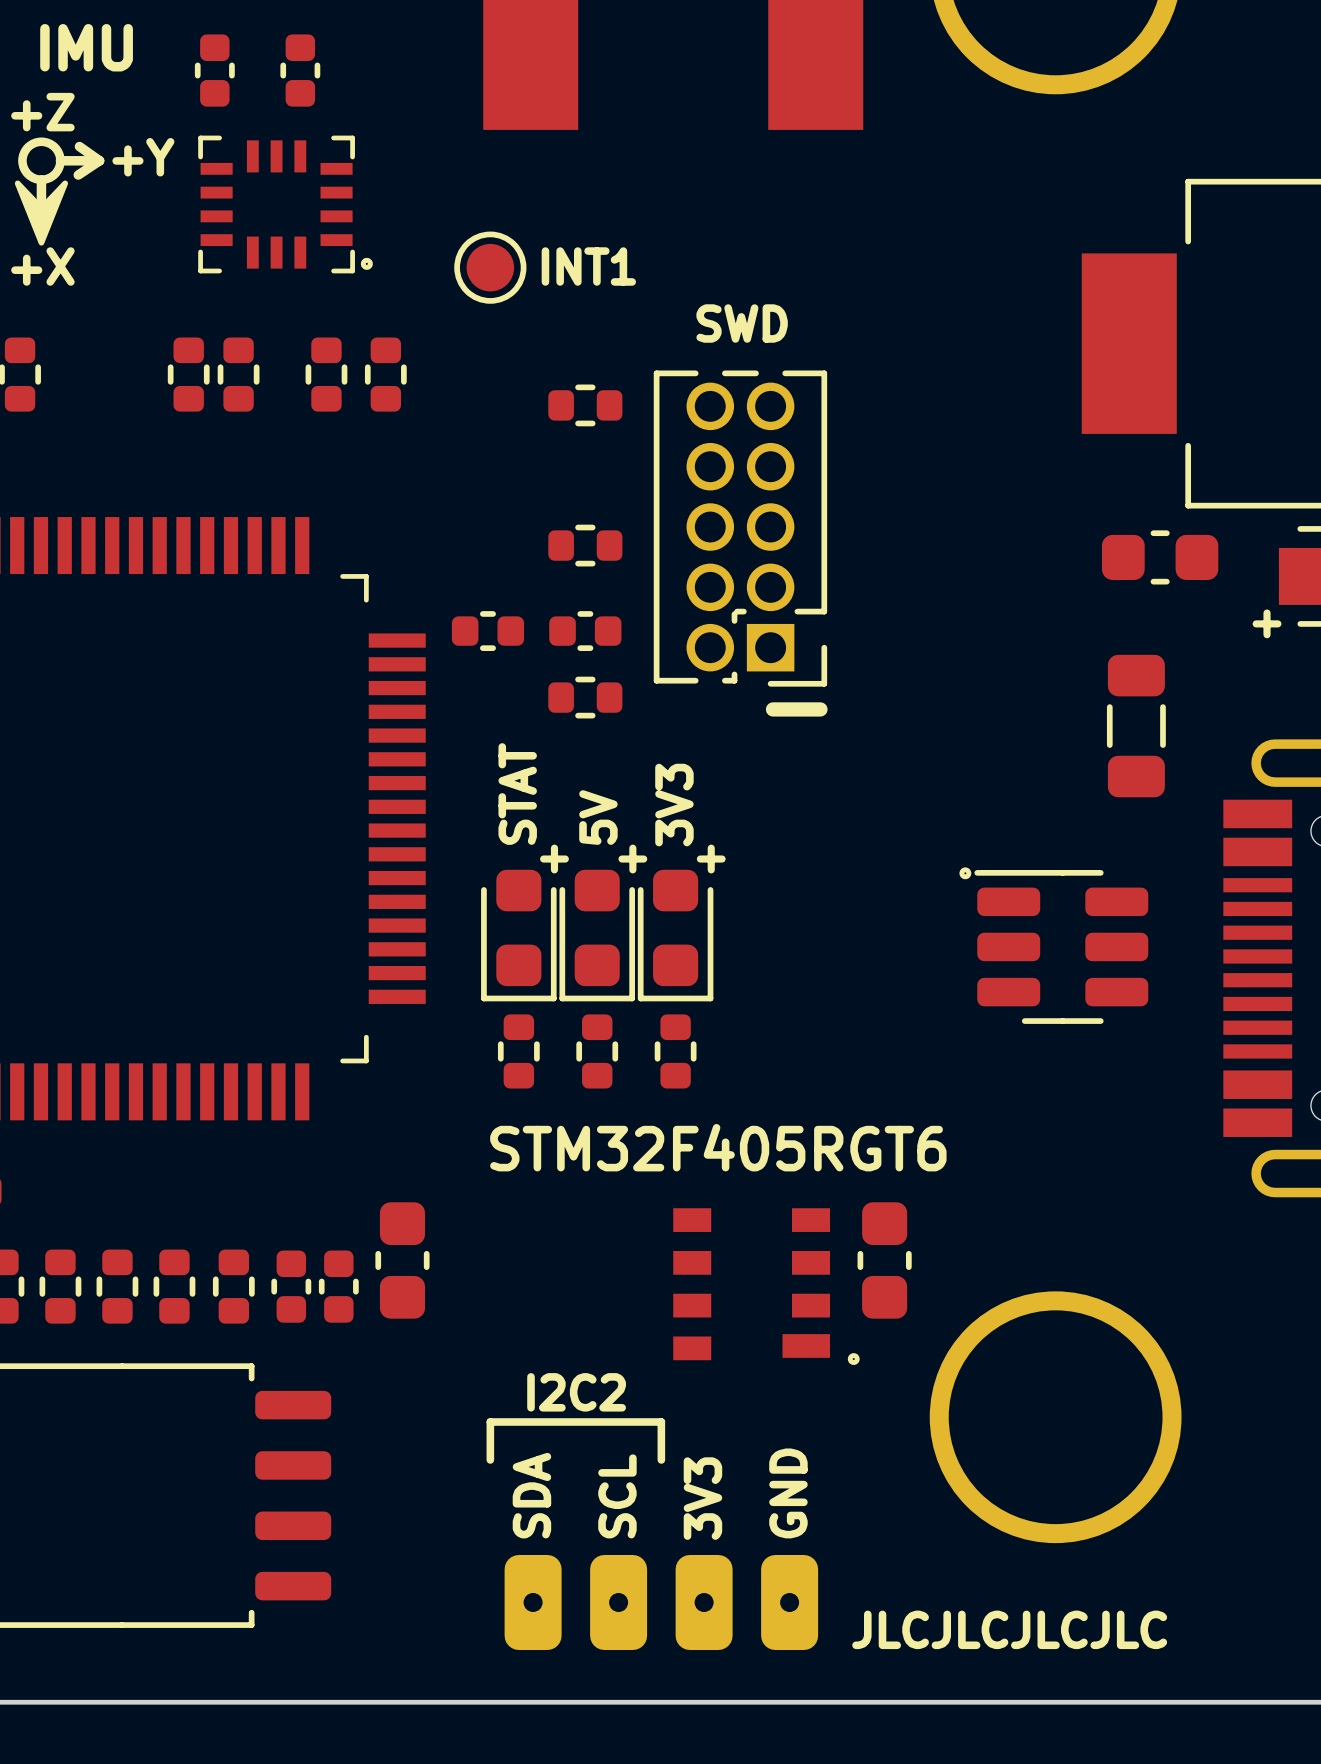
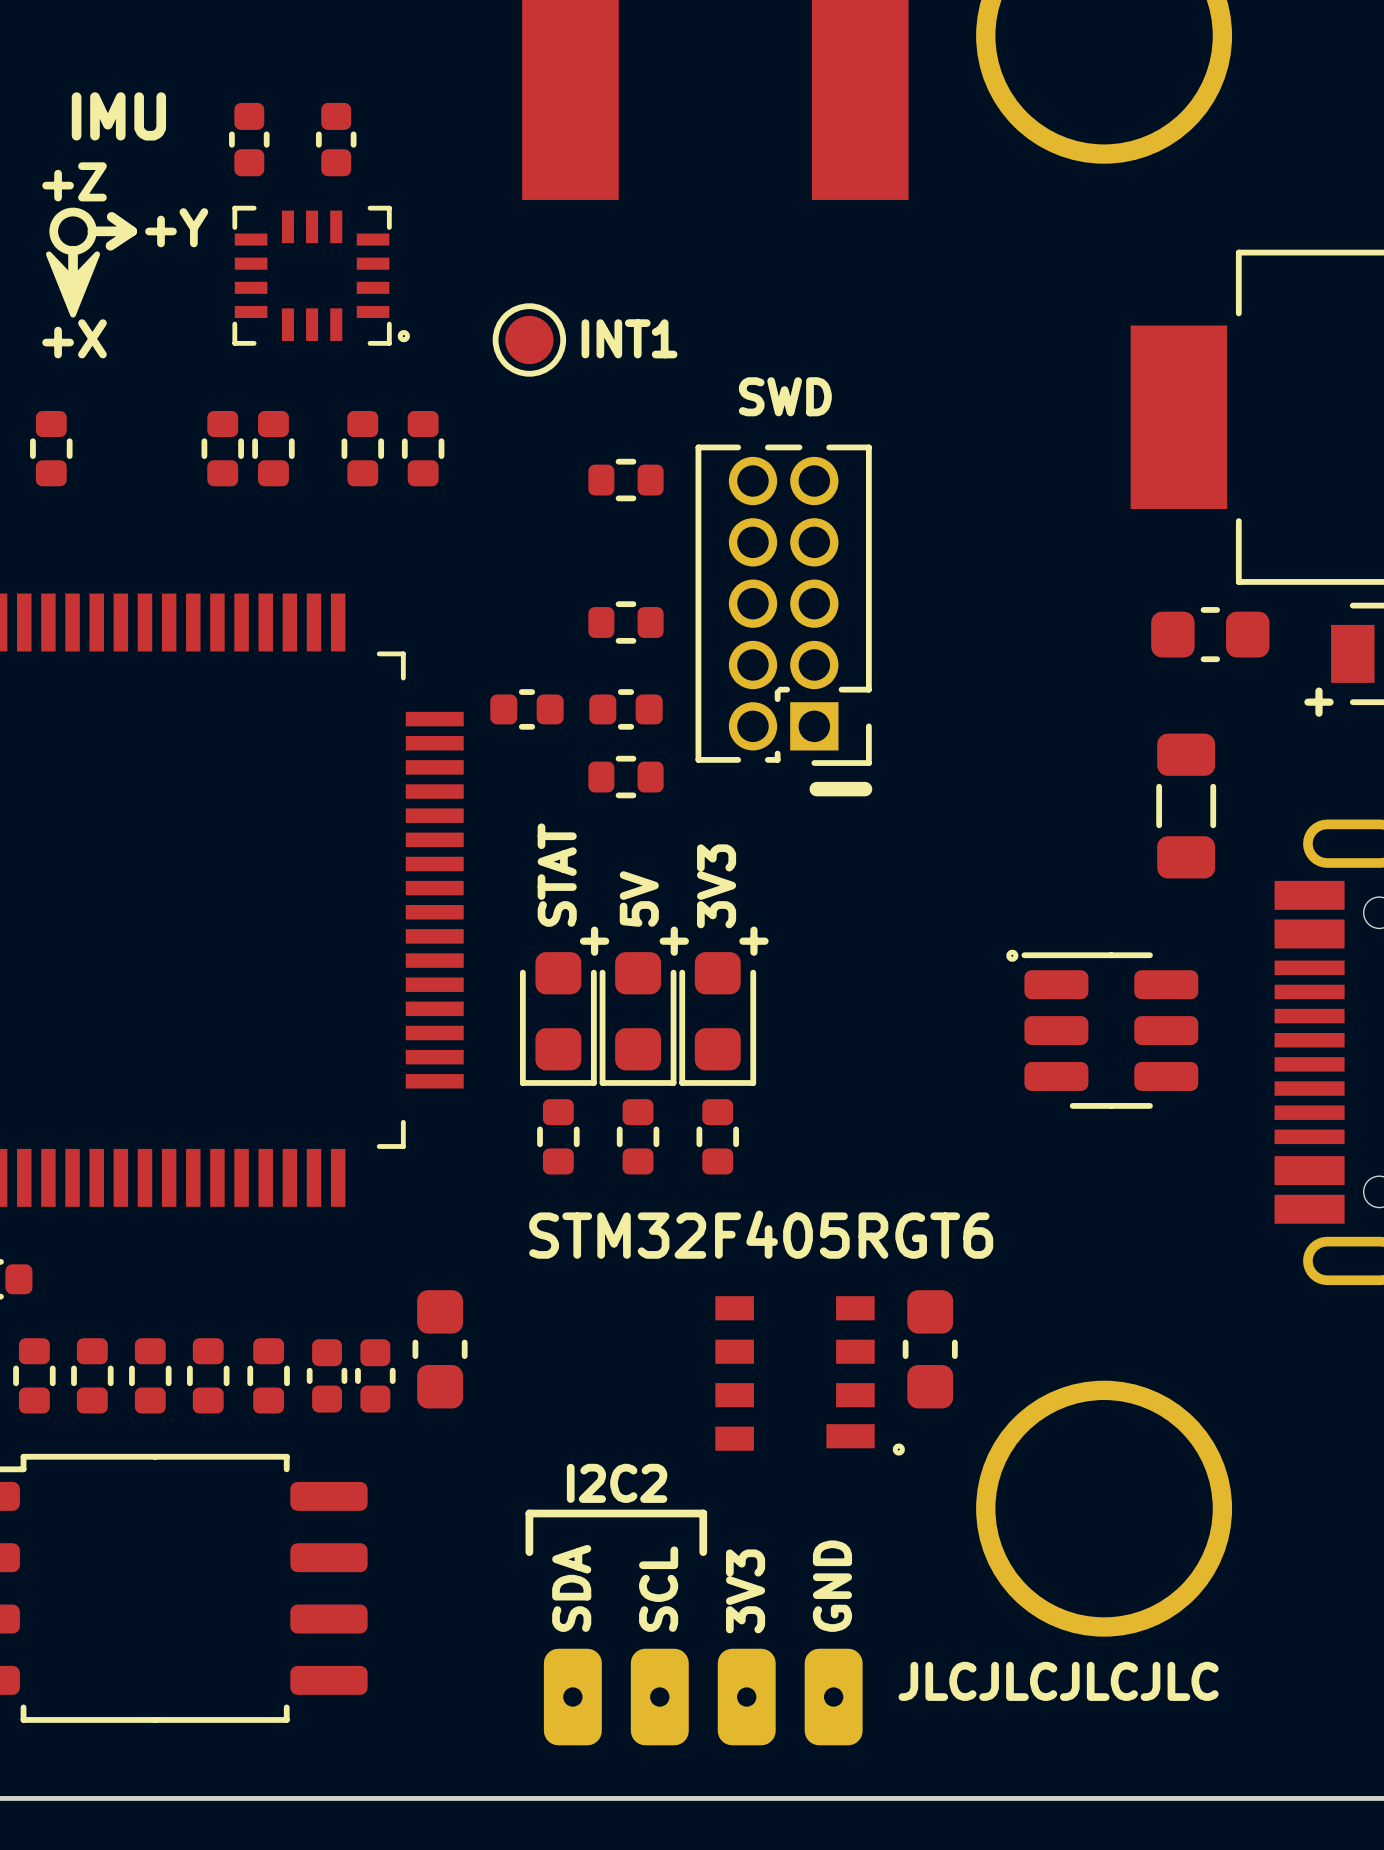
text position: JLCJLCJLCJLC (1009, 1629) -> JLCJLCJLCJLC (1058, 1681)

